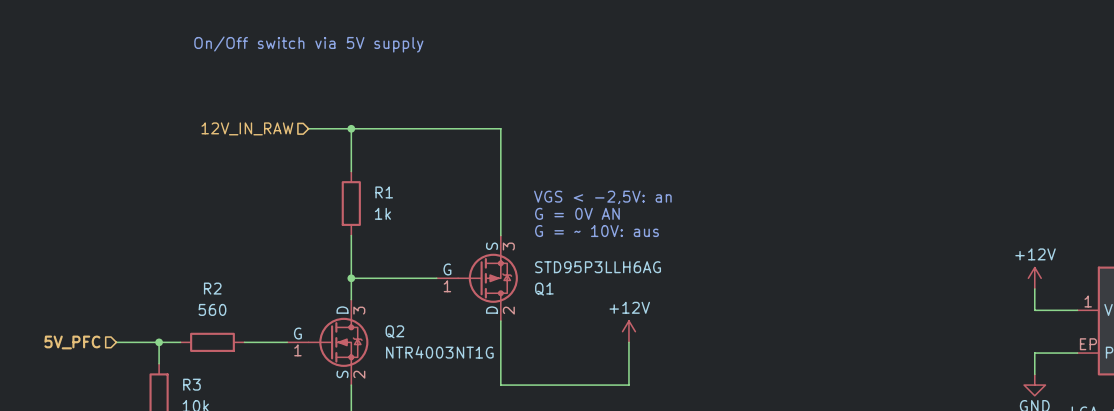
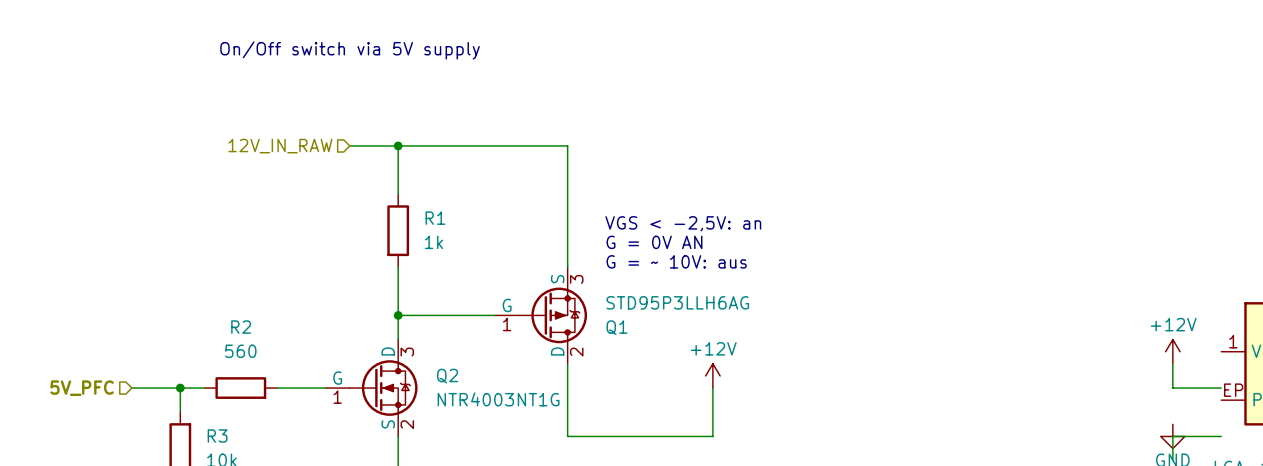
power symbol position: +12V (1034, 278) -> +12V (1172, 351)
wire: (1034, 288) (1034, 310) (1077, 310) -> (1172, 363) (1172, 388) (1221, 388)
wire: (1077, 353) (1034, 353) (1034, 374) -> (1221, 436) (1172, 436) (1172, 460)

